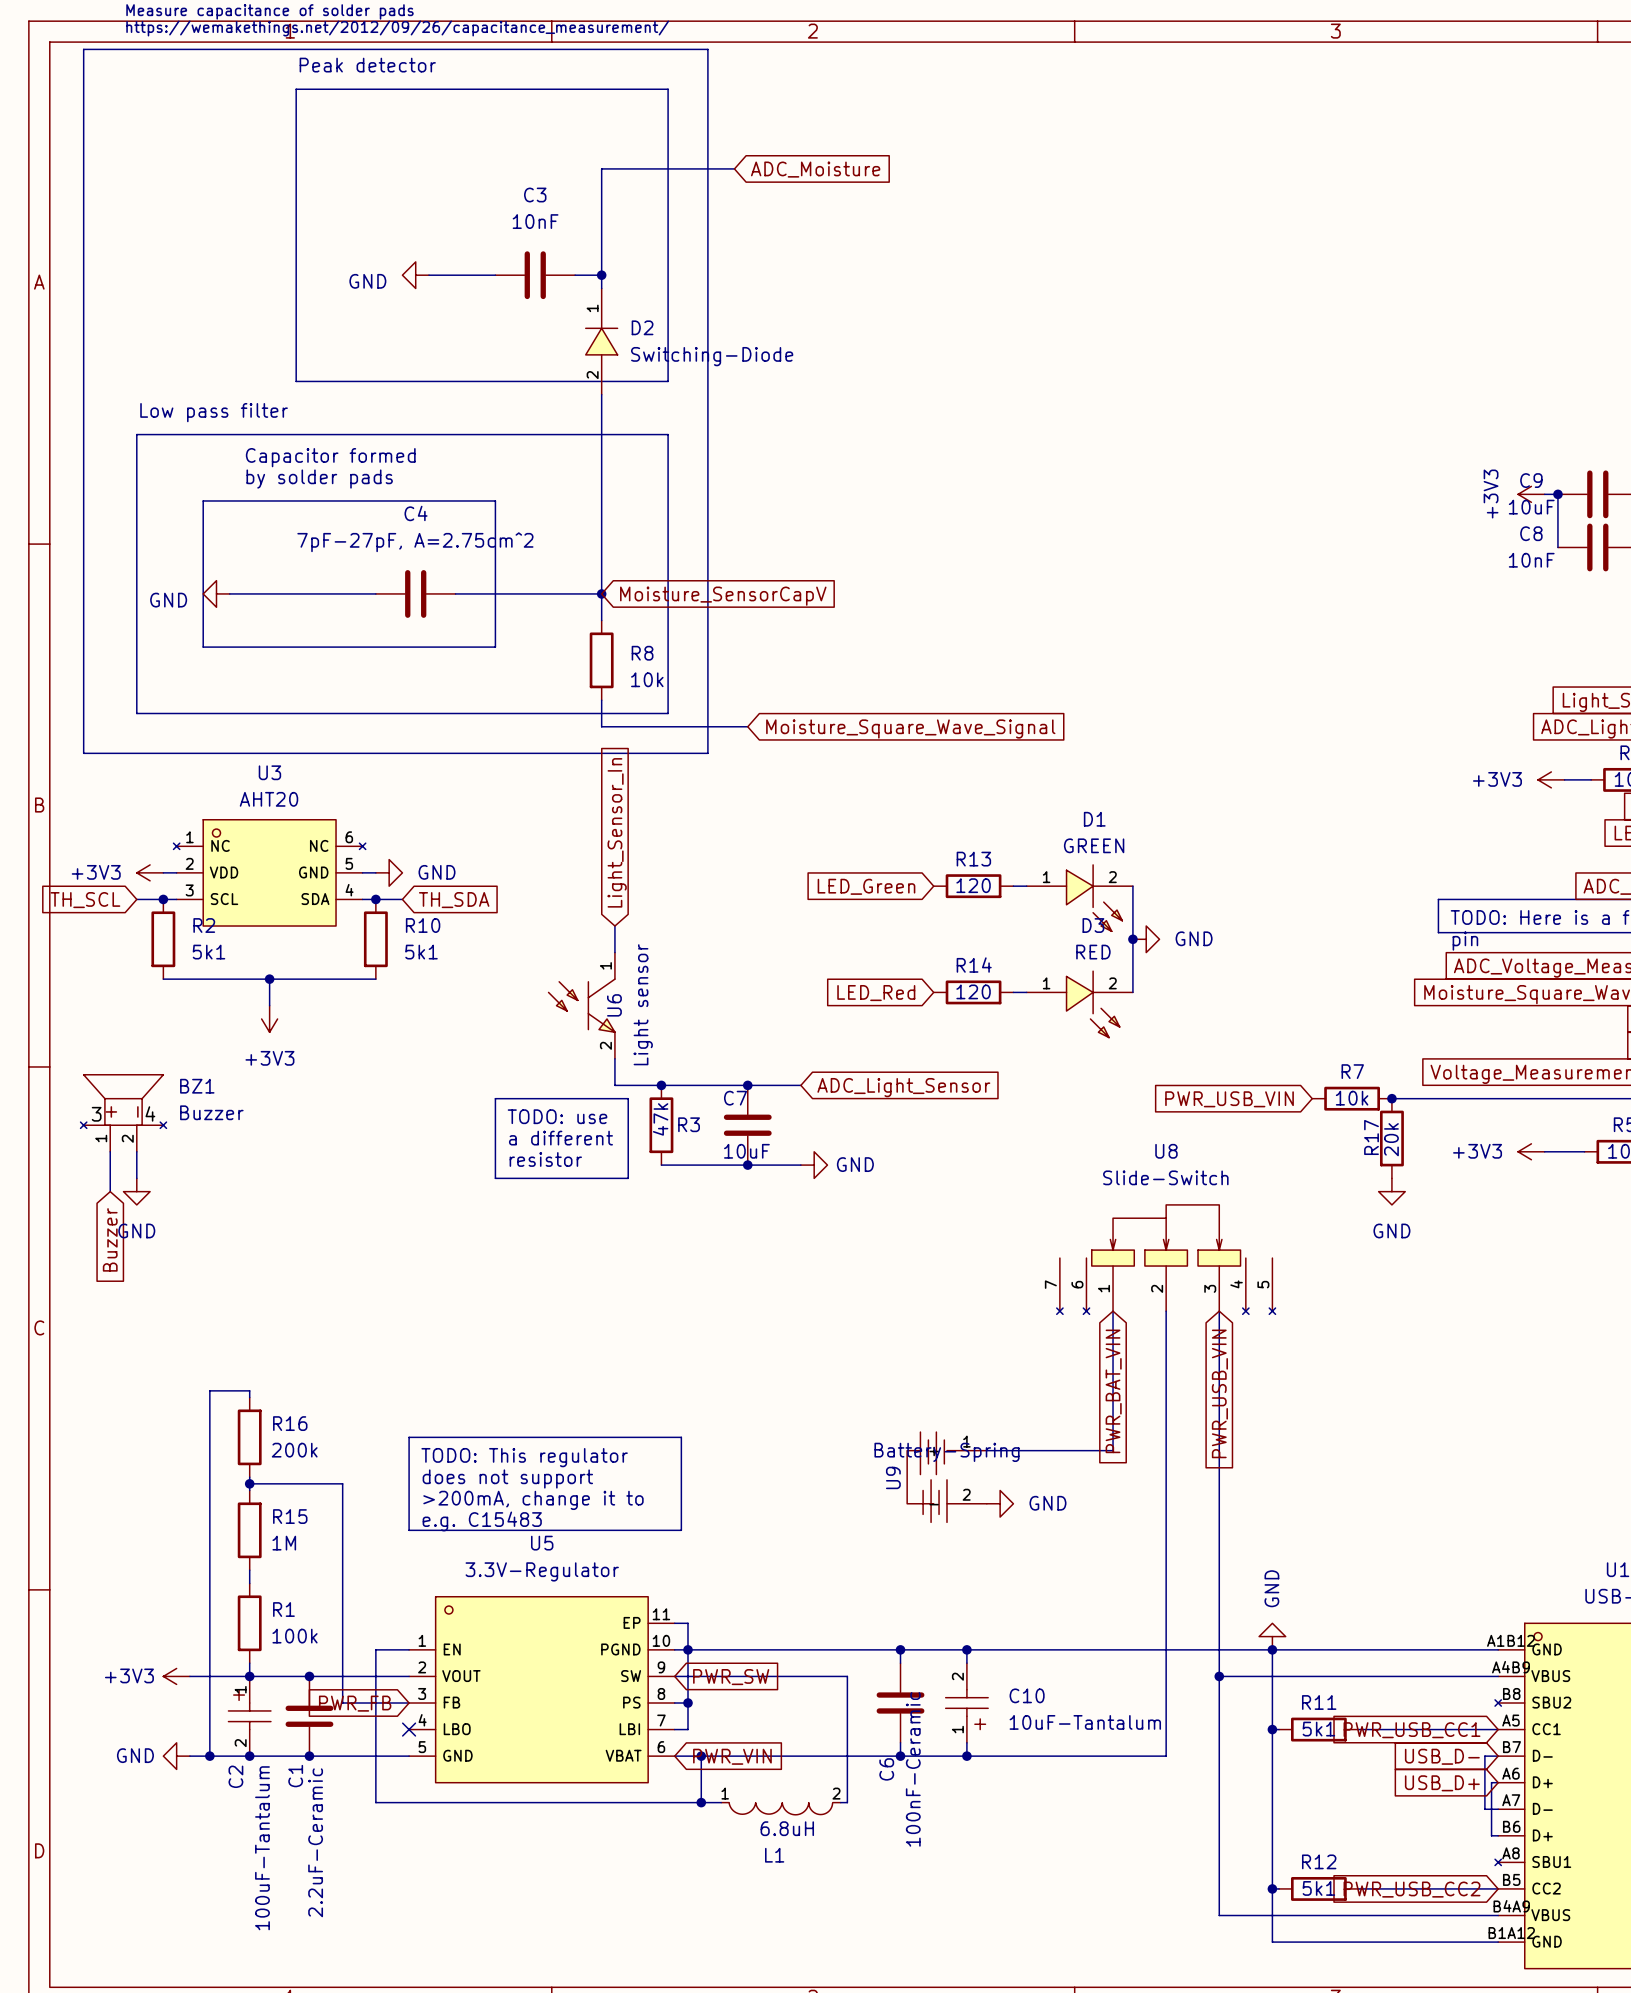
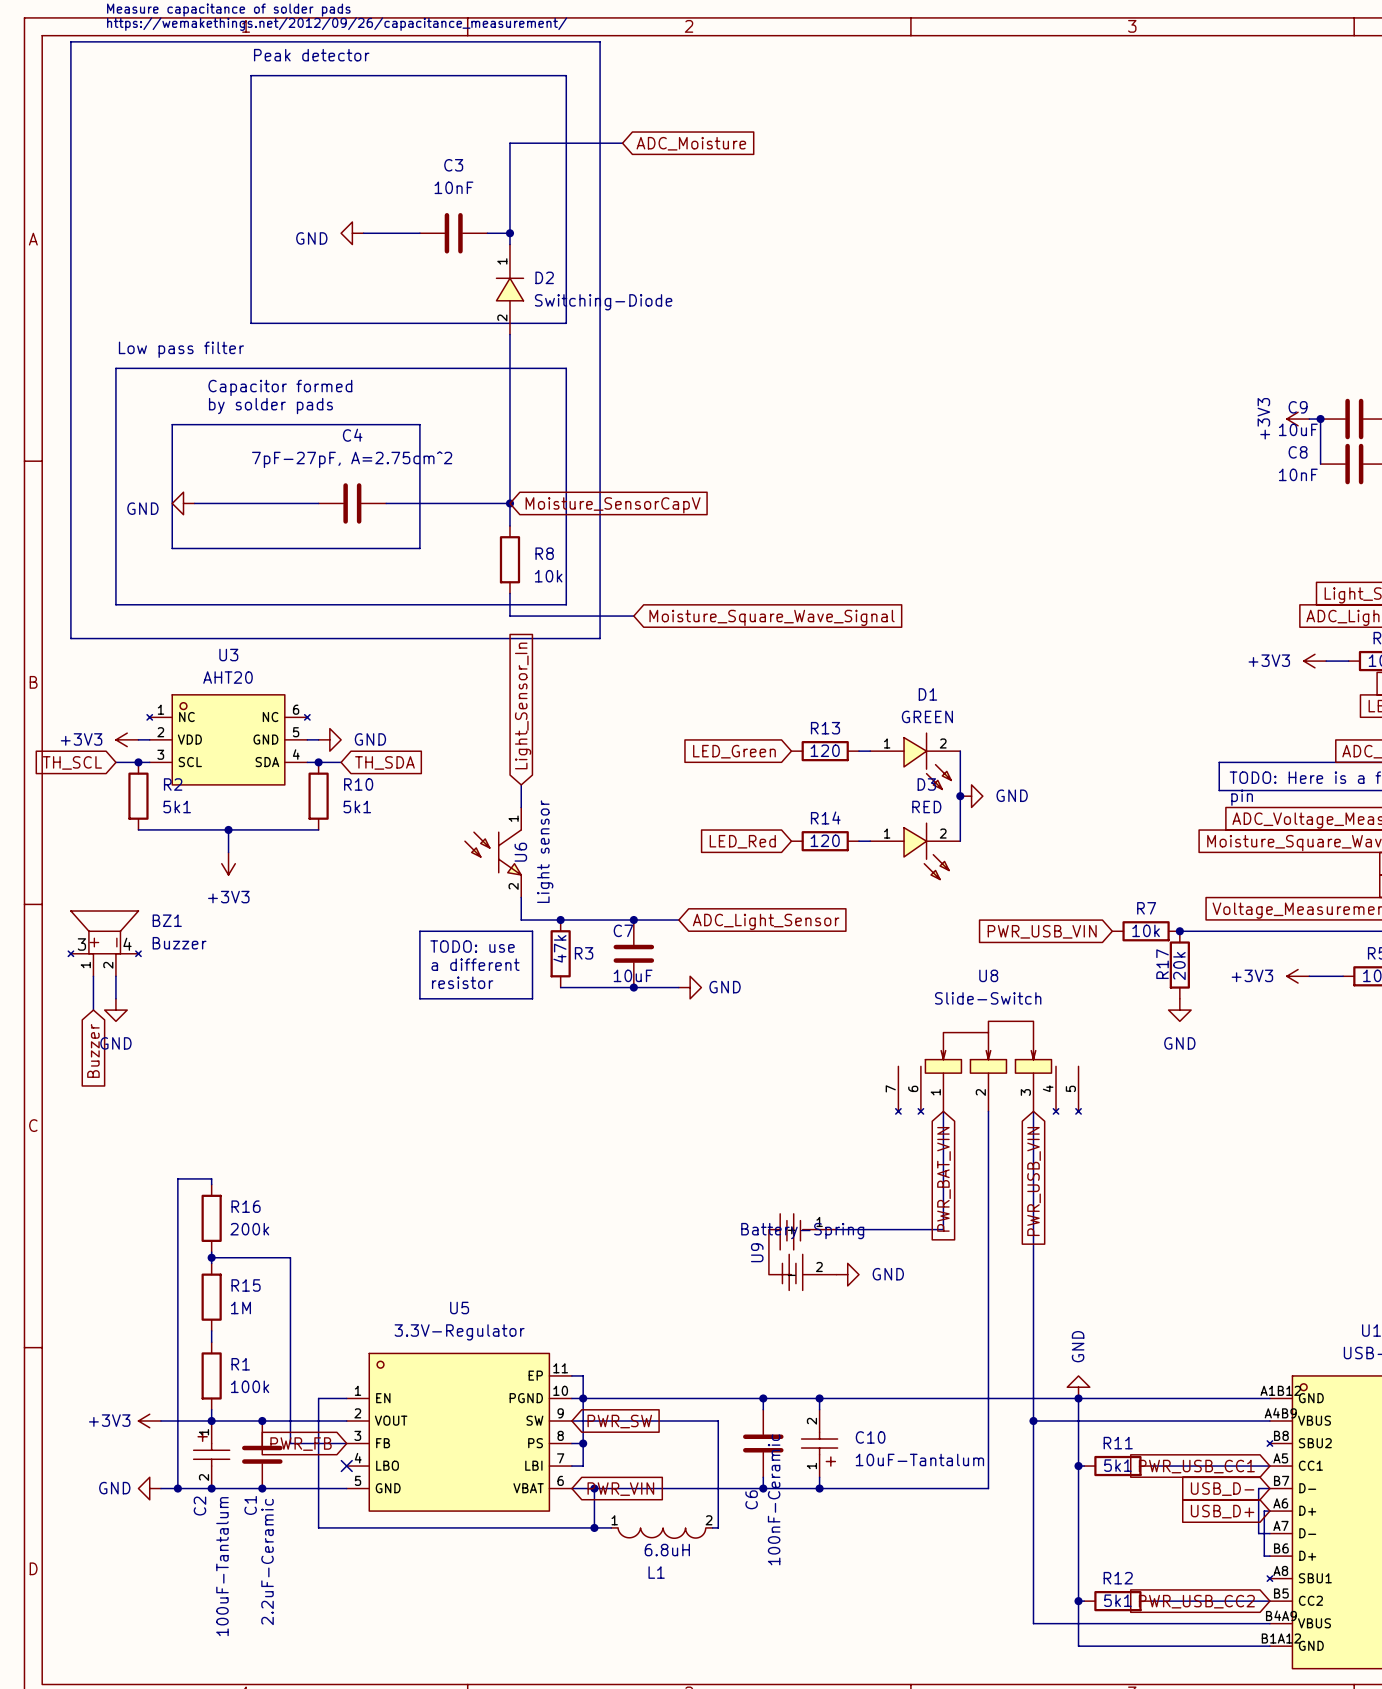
line: (409, 1437) (681, 1437) (681, 1530) (409, 1530) (409, 1437) -> none
text: TODO: This regulator (524, 1457) -> none
text: does not support (507, 1478) -> none
text: >200mA, change it to (533, 1500) -> none
text: e.g. C15483 (482, 1521) -> none

